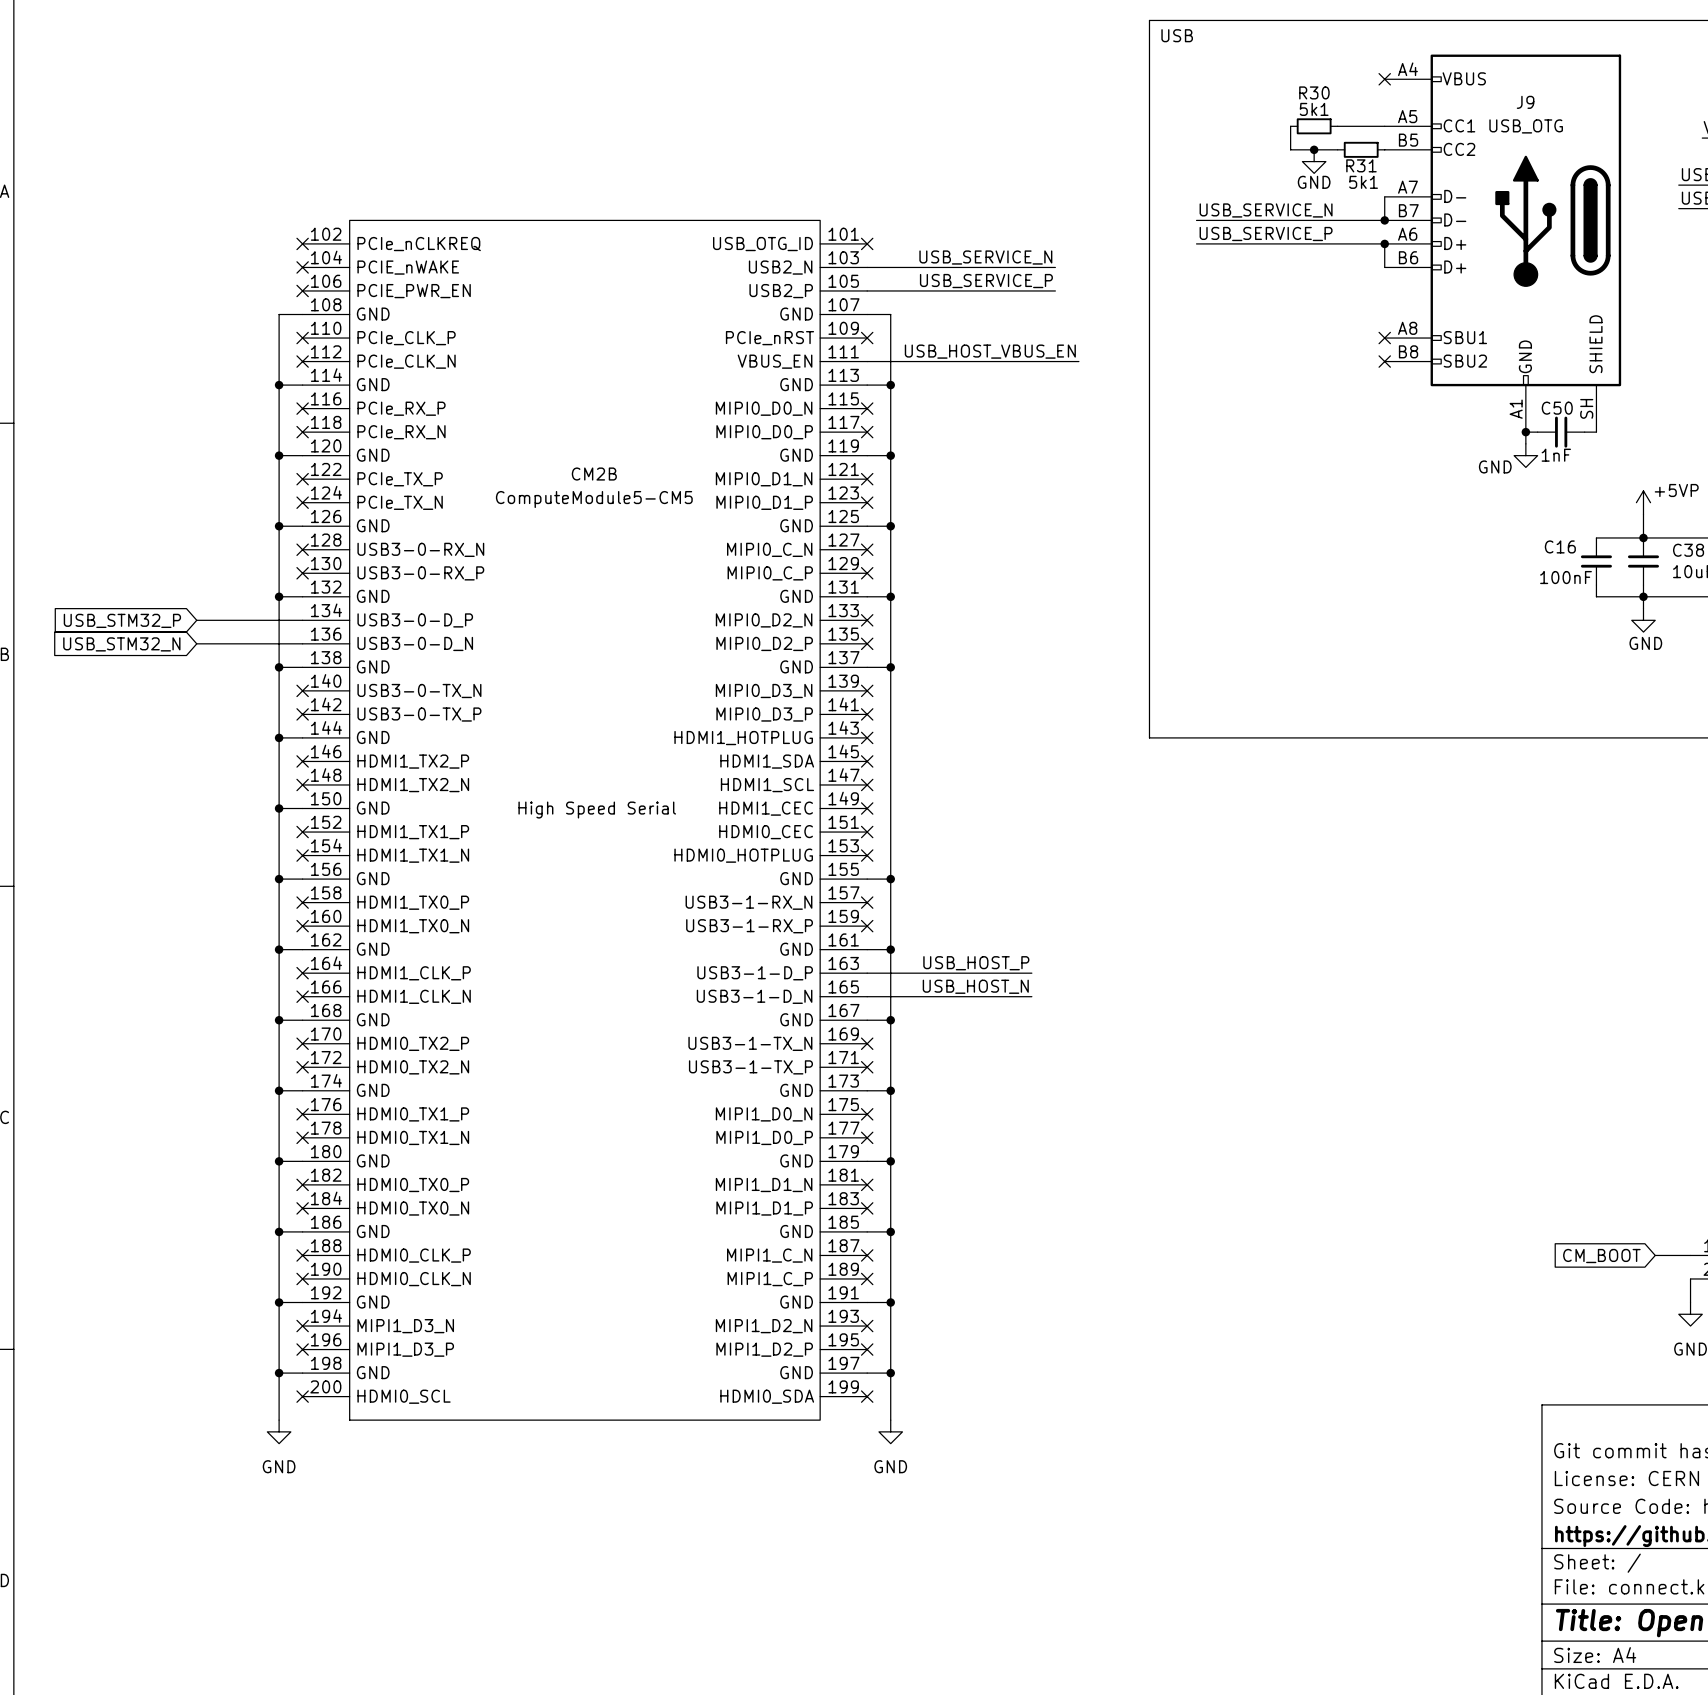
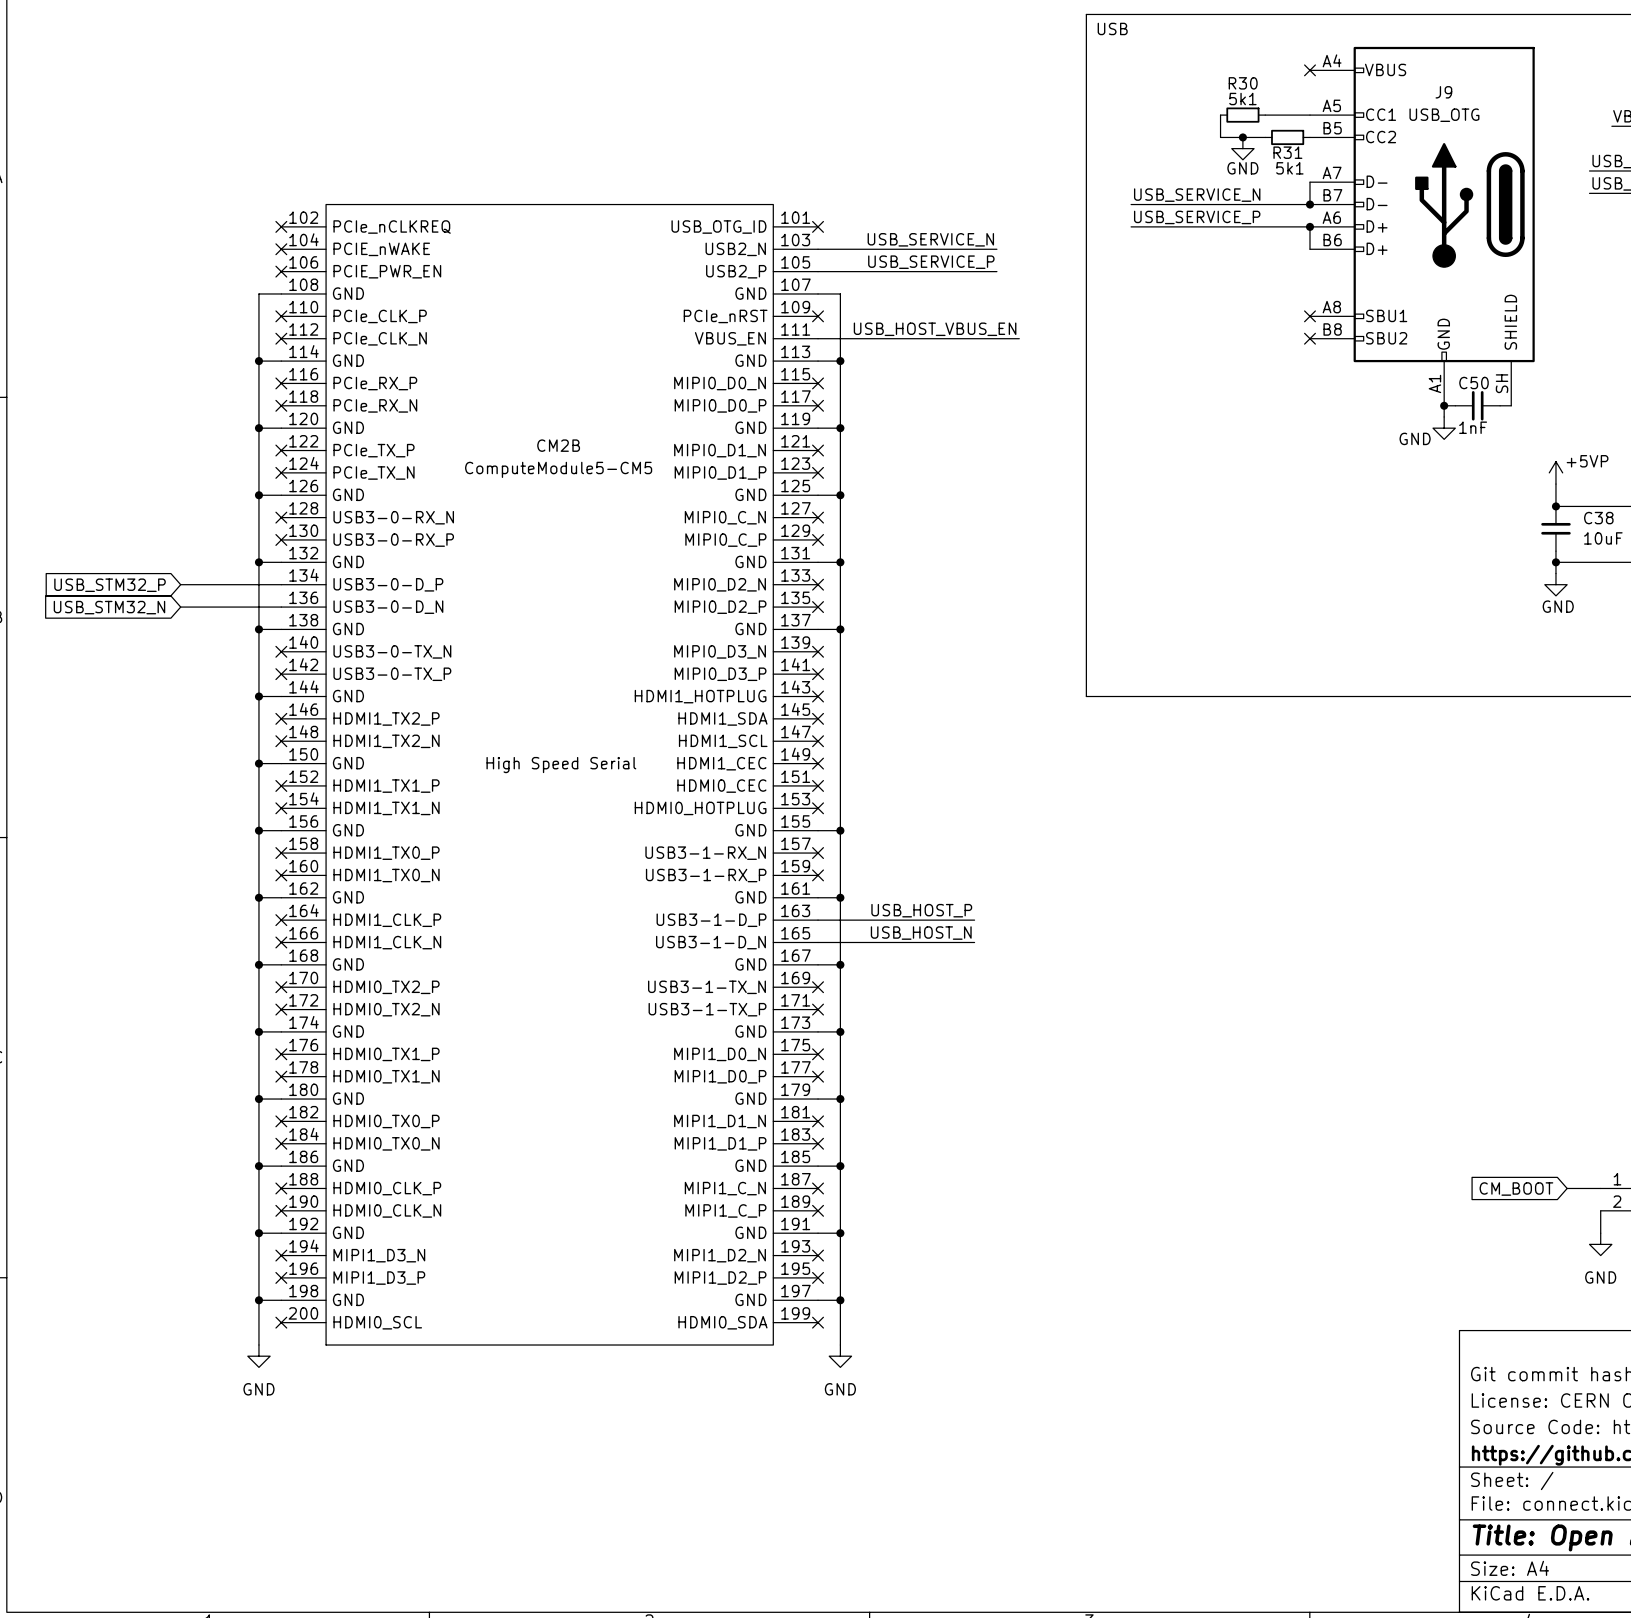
wire: (1596, 537) (1643, 537) -> none
C16: 100nF (1596, 561) -> none
wire: (1596, 585) (1596, 596) (1643, 596) -> none

